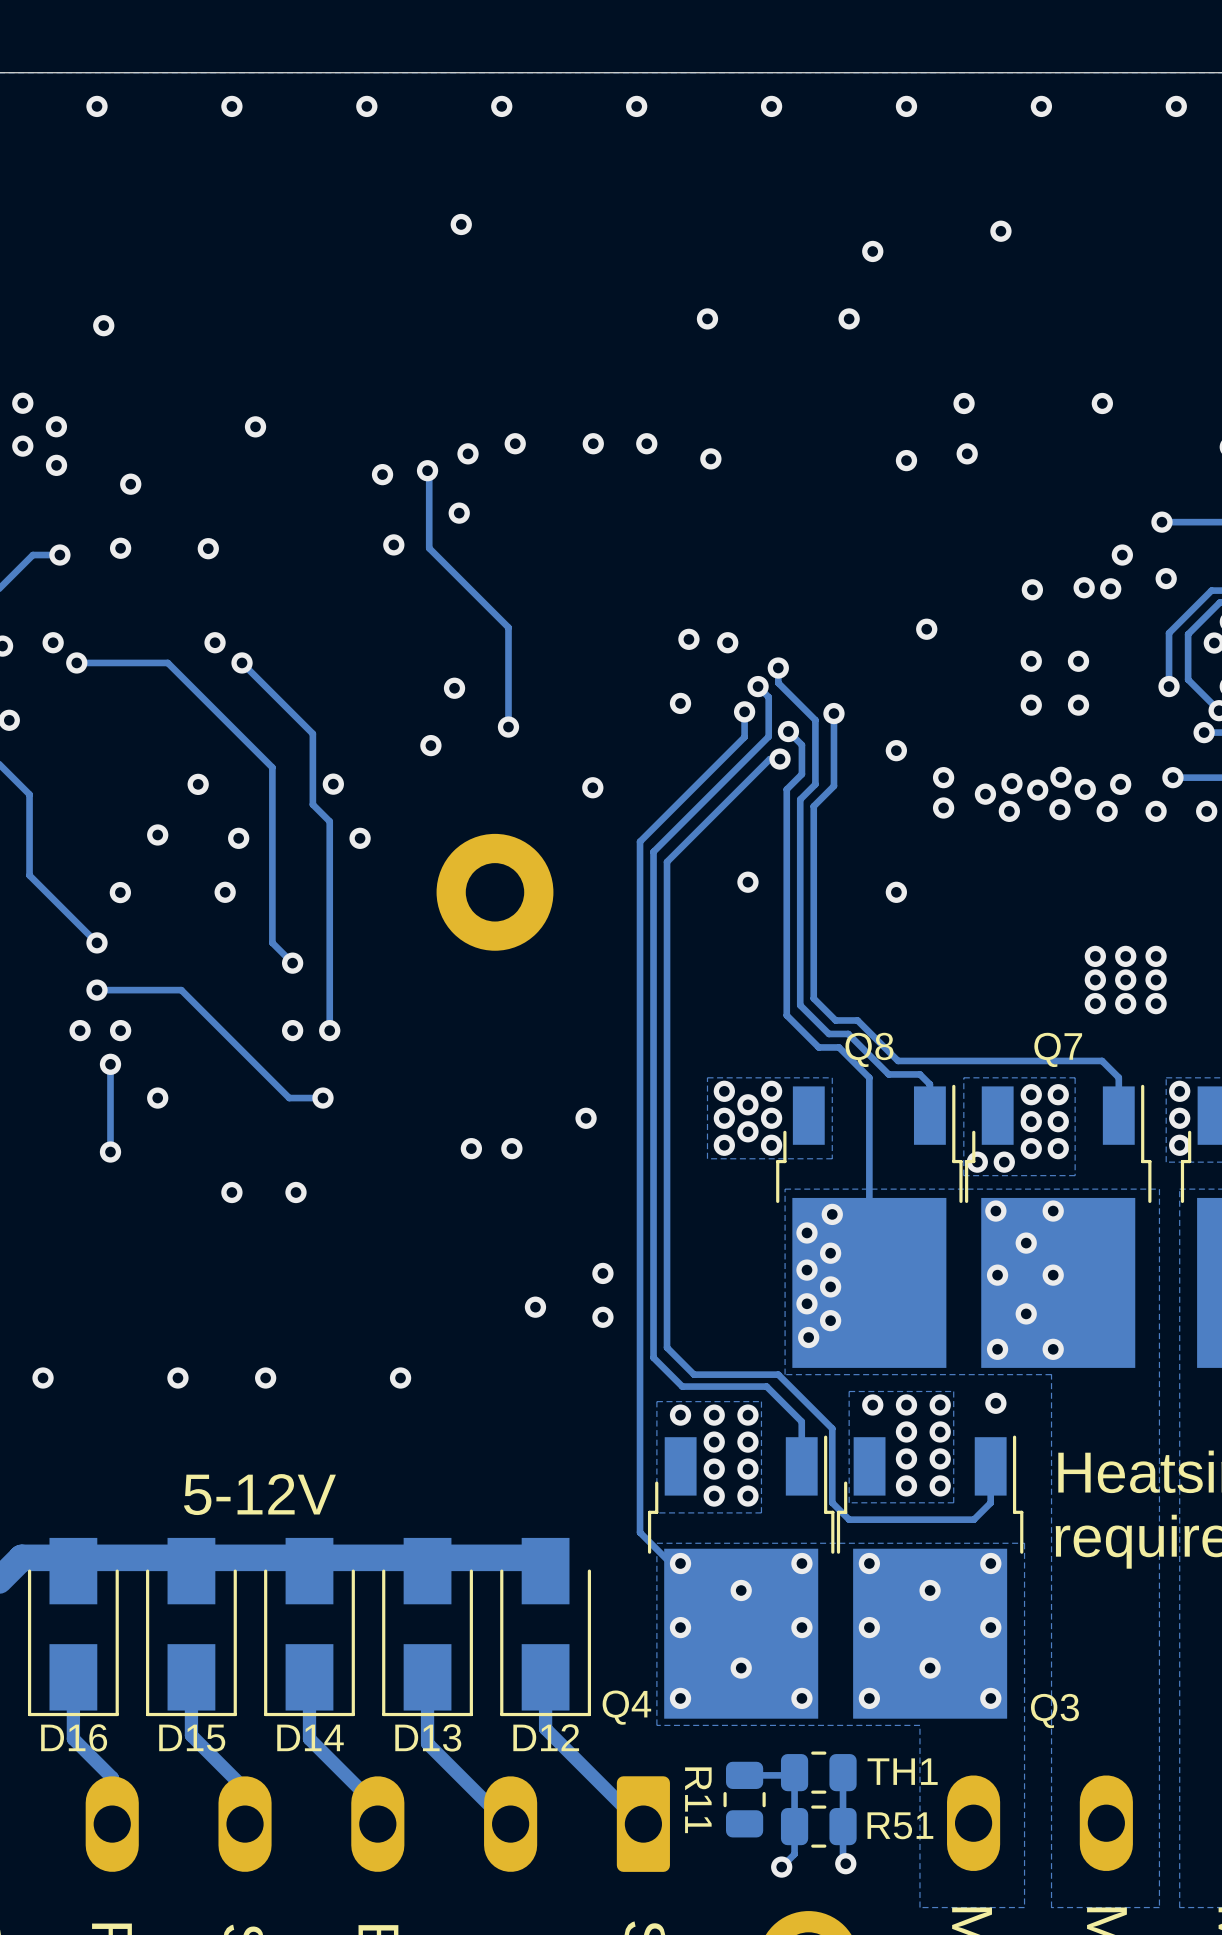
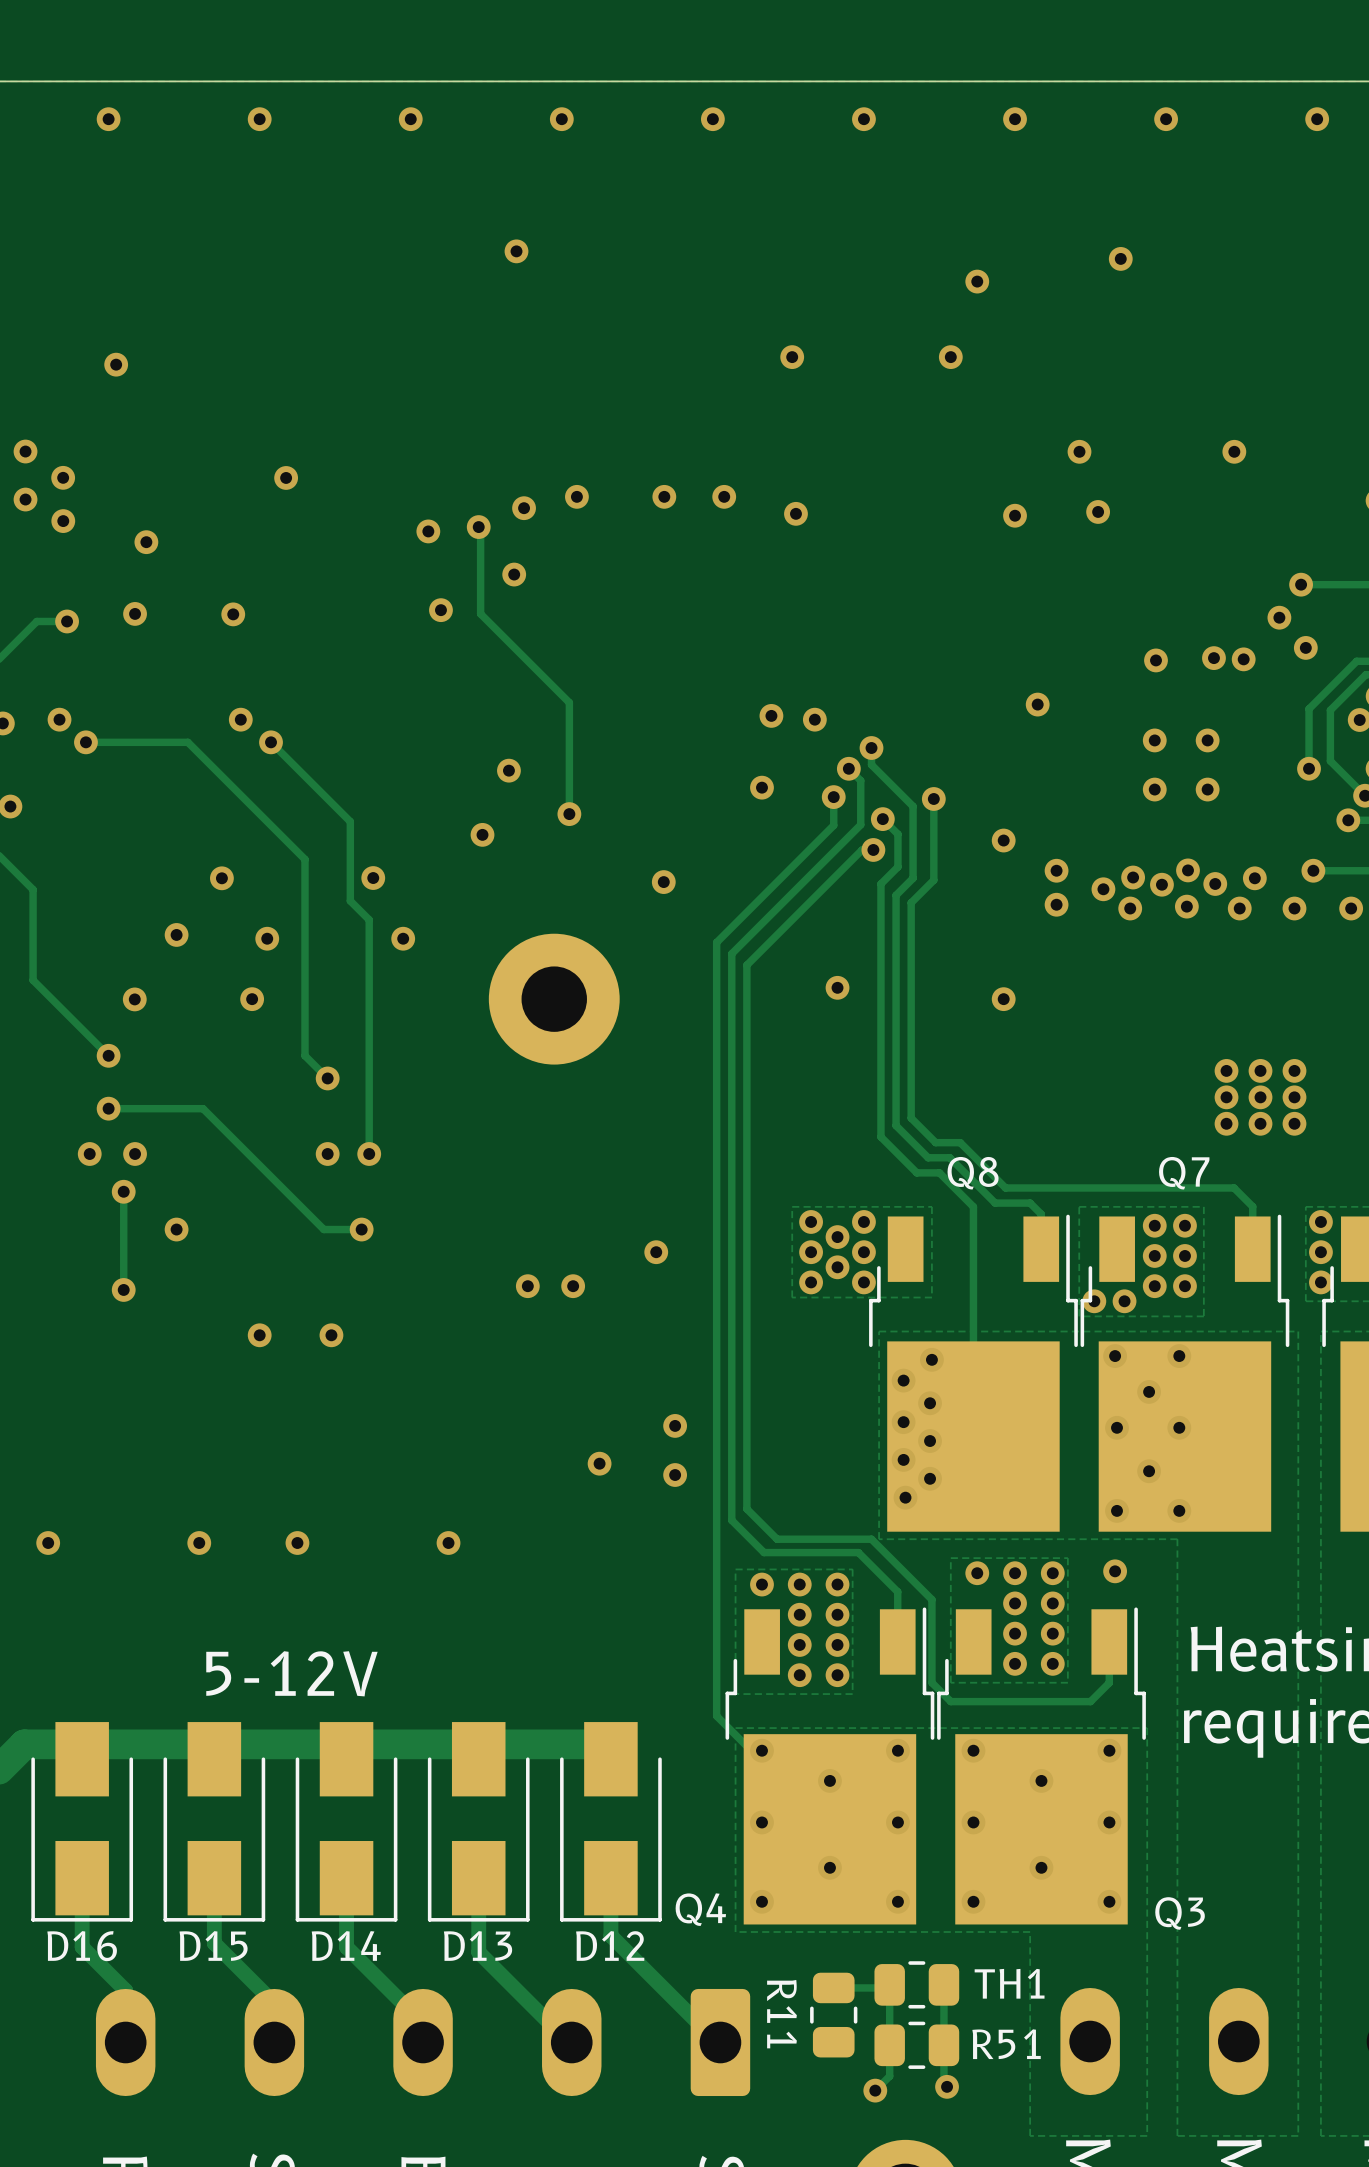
via position: (967, 453) -> (1098, 511)
via position: (1122, 555) -> (1279, 617)

